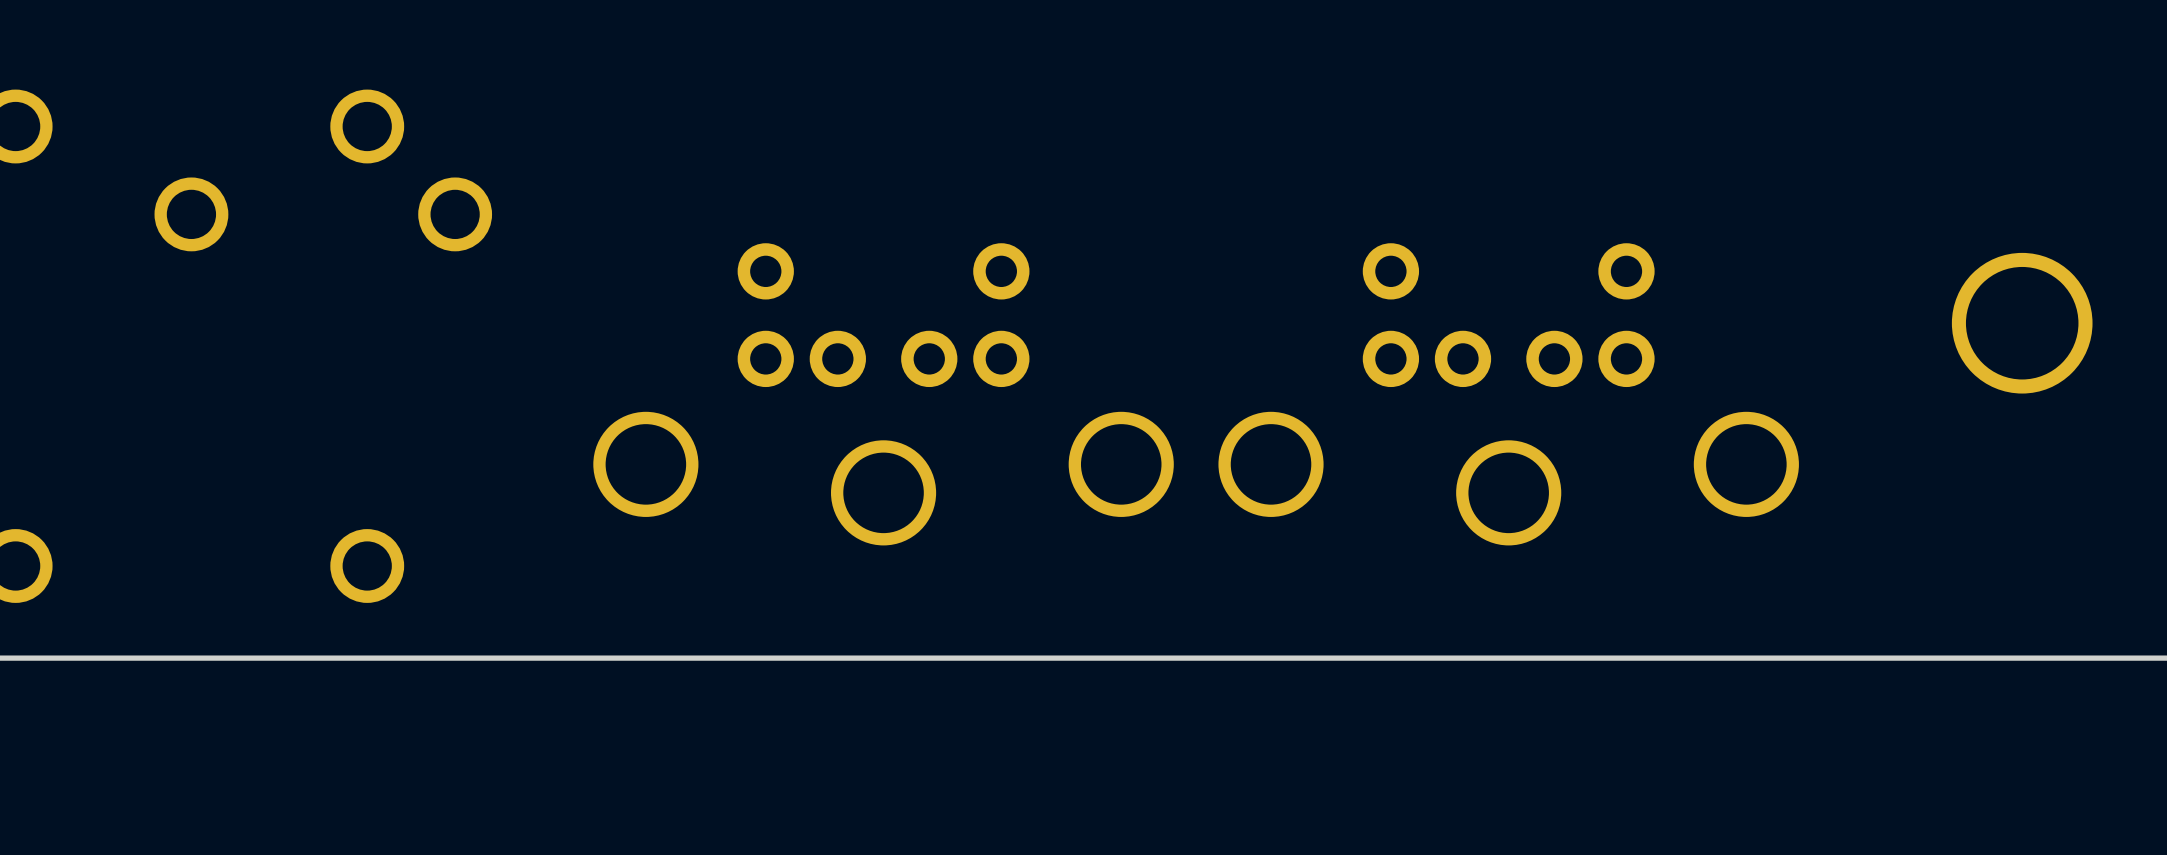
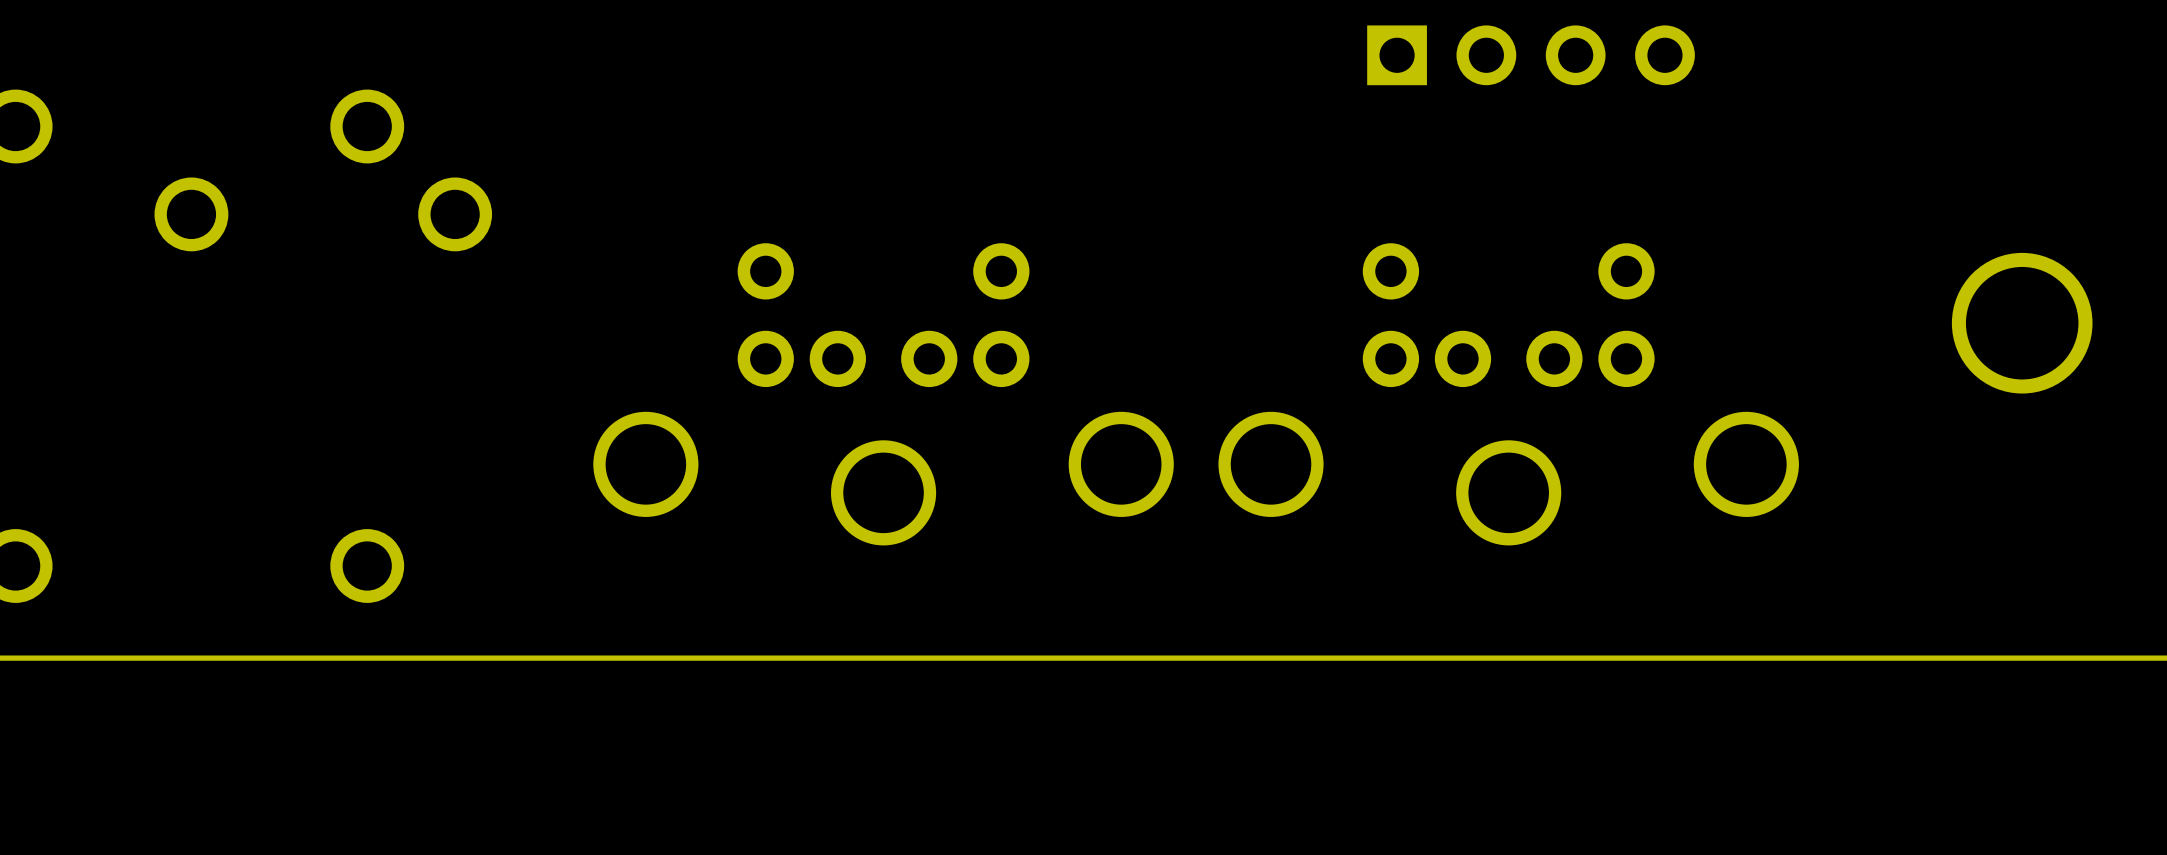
part: none -> (1531, 55)

